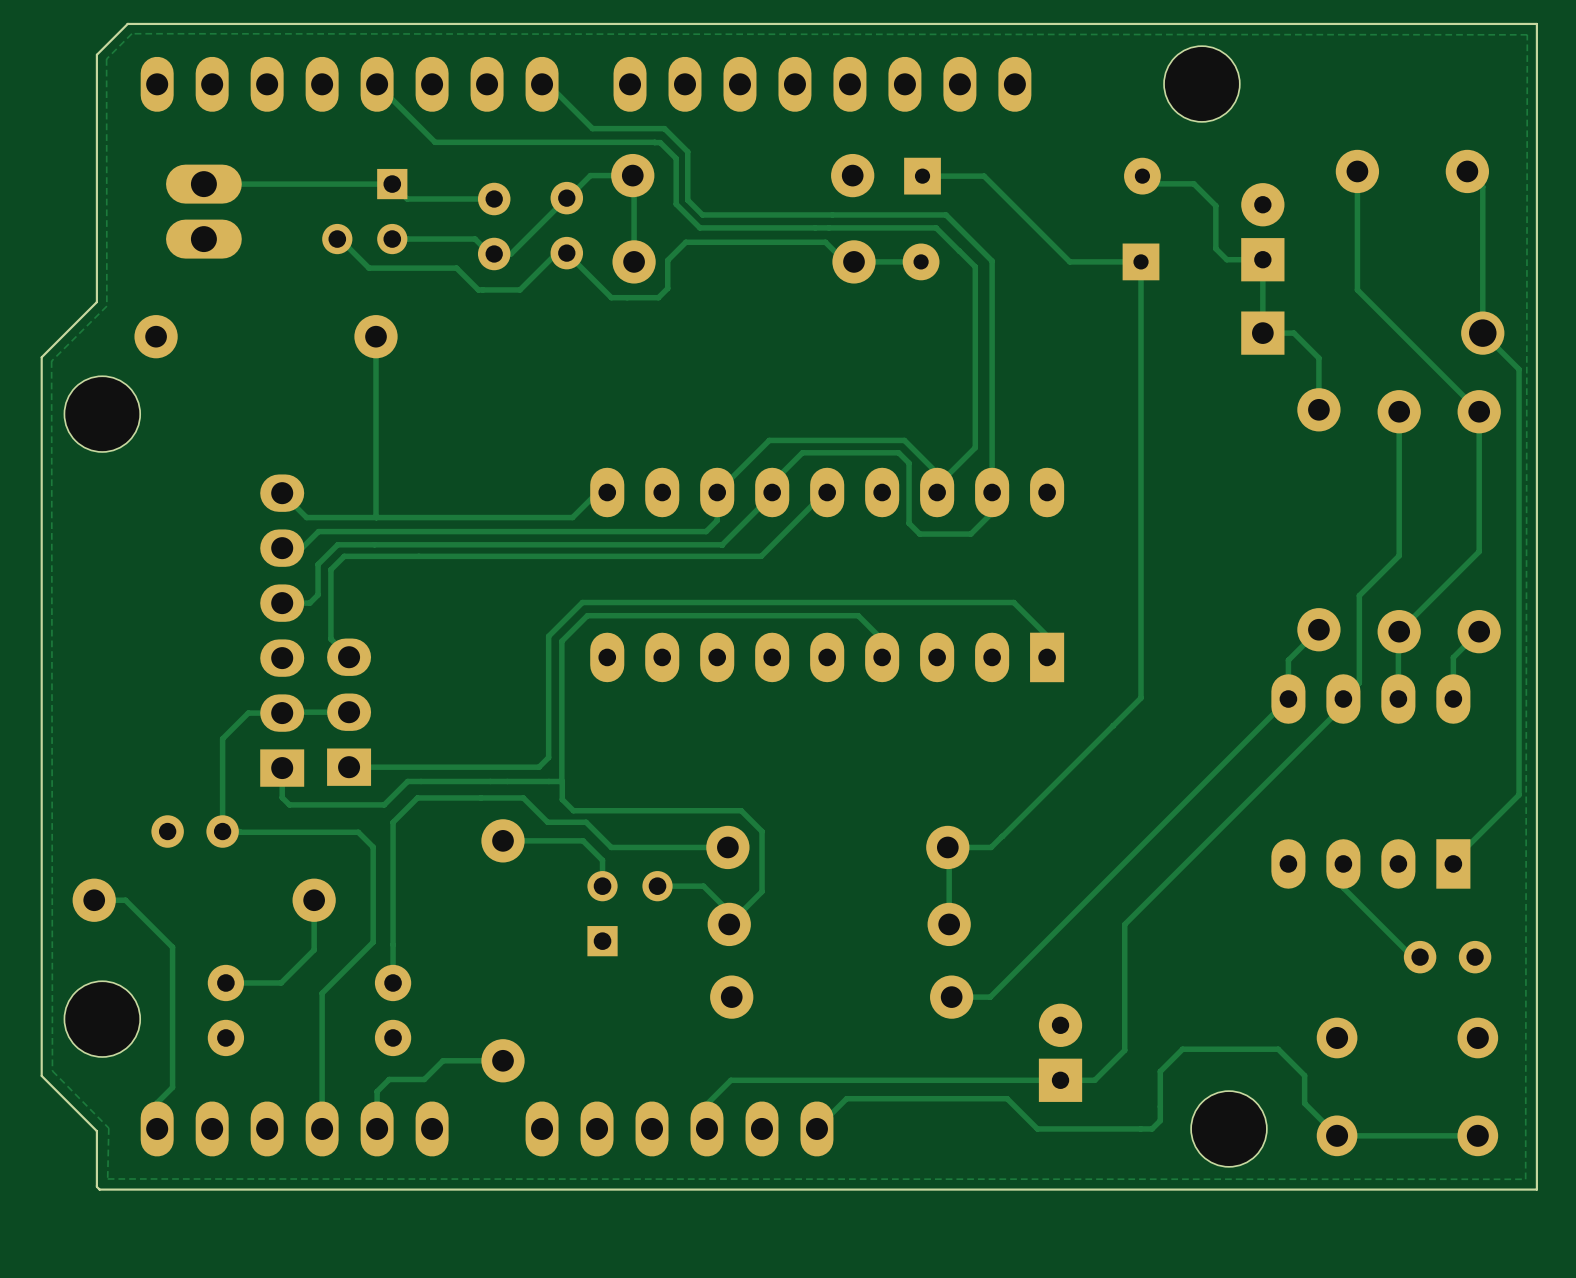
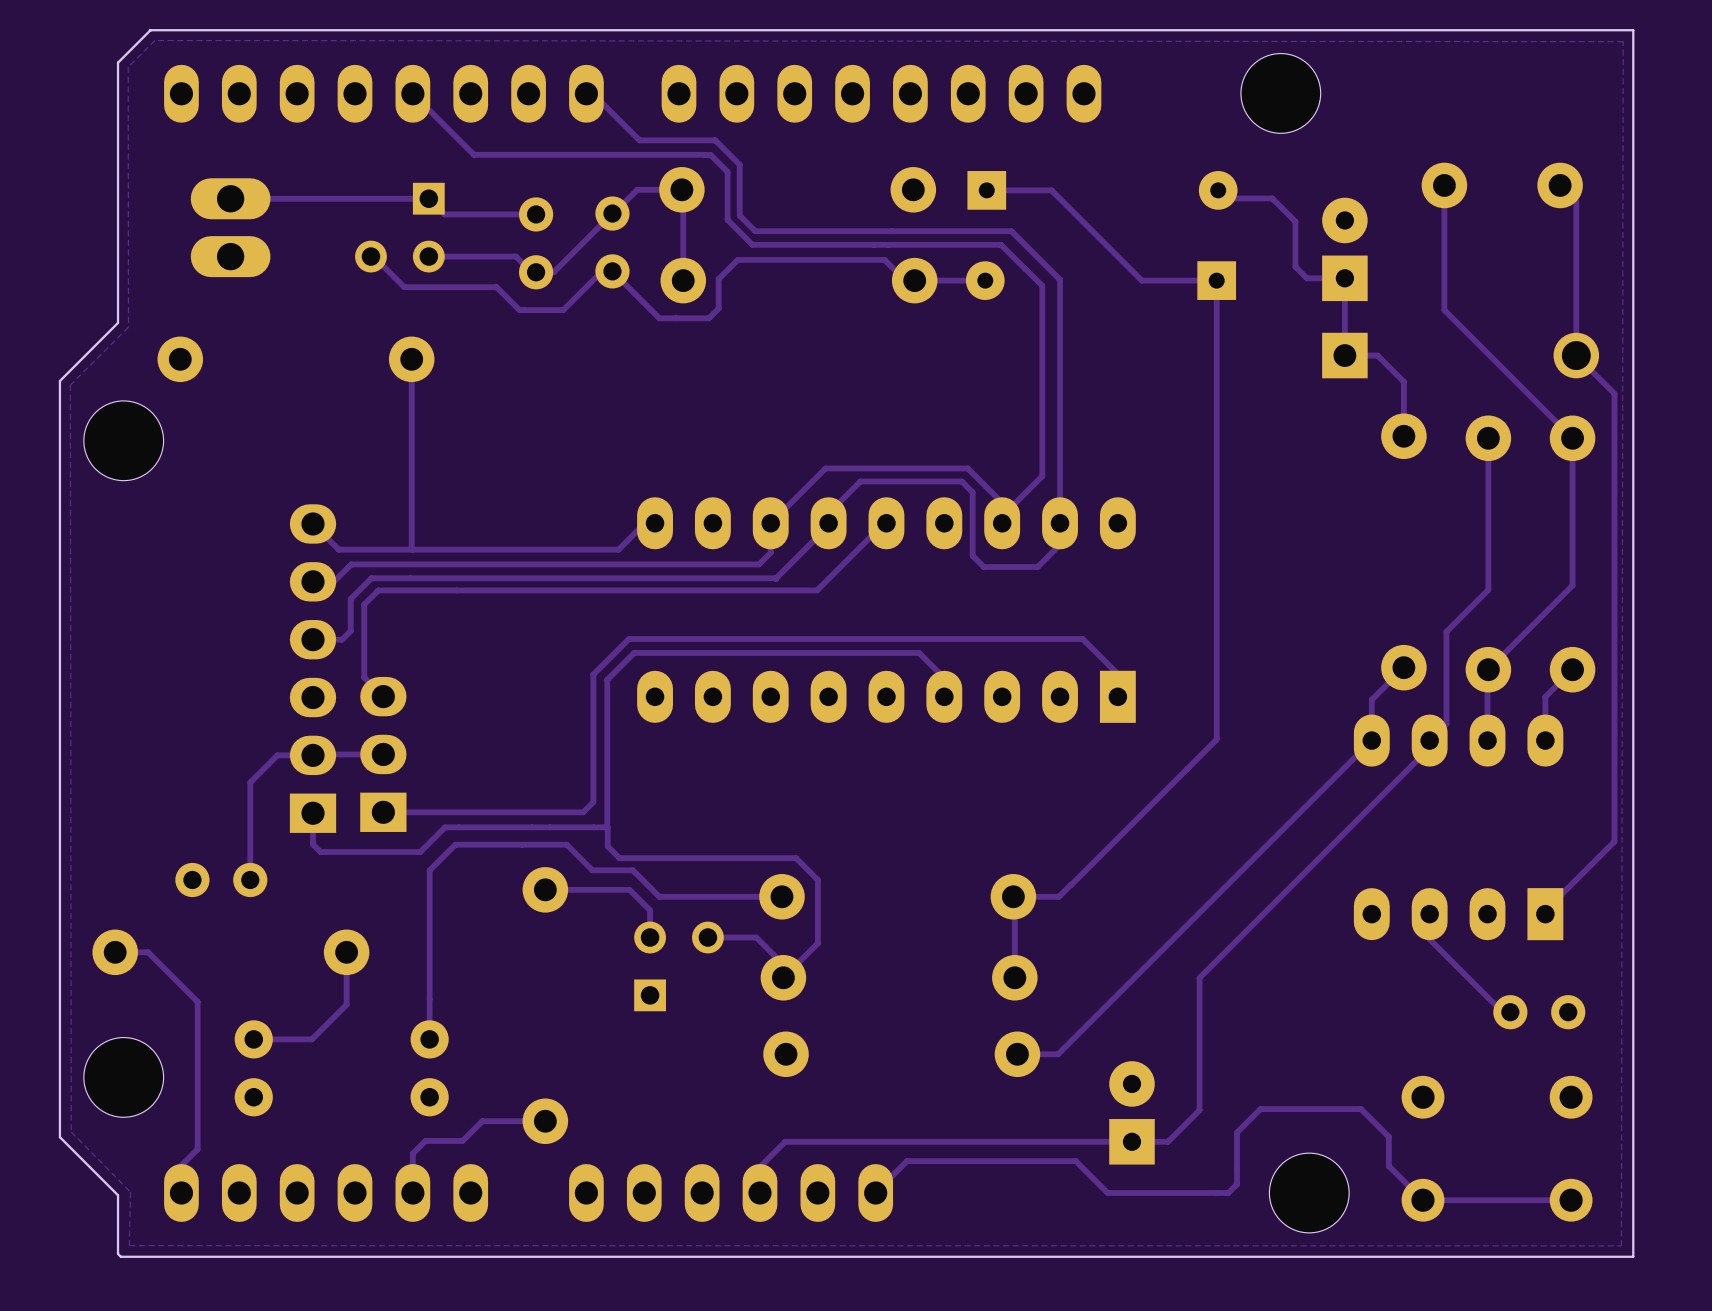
track: (222, 831) (358, 832) (373, 847) (373, 942) (322, 993) (322, 1128) -> none

